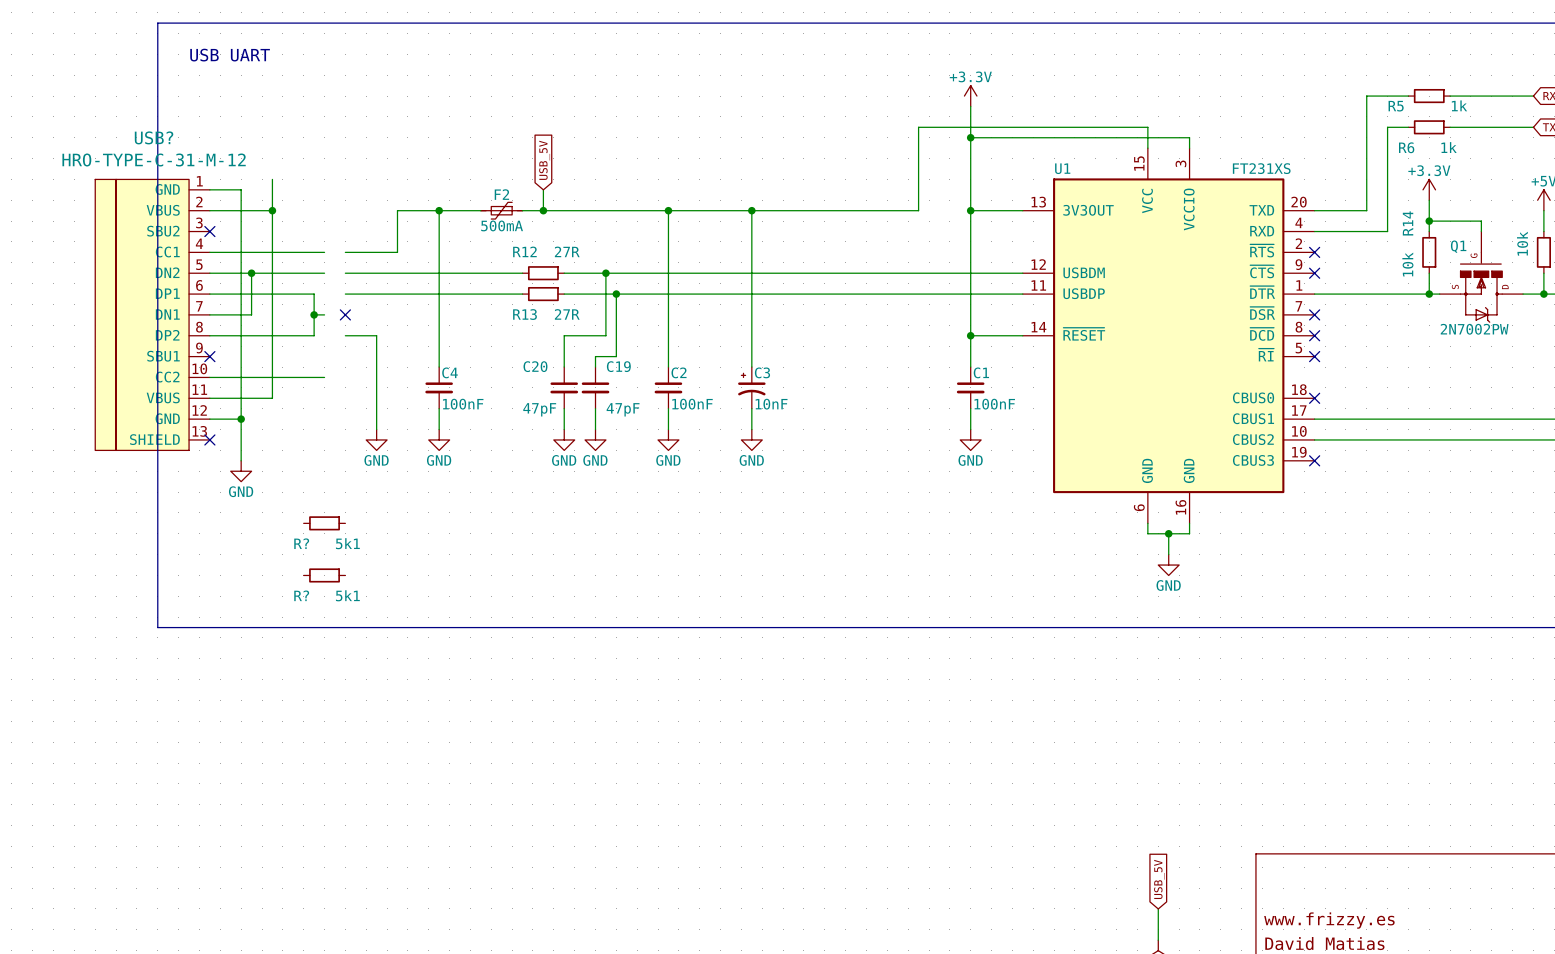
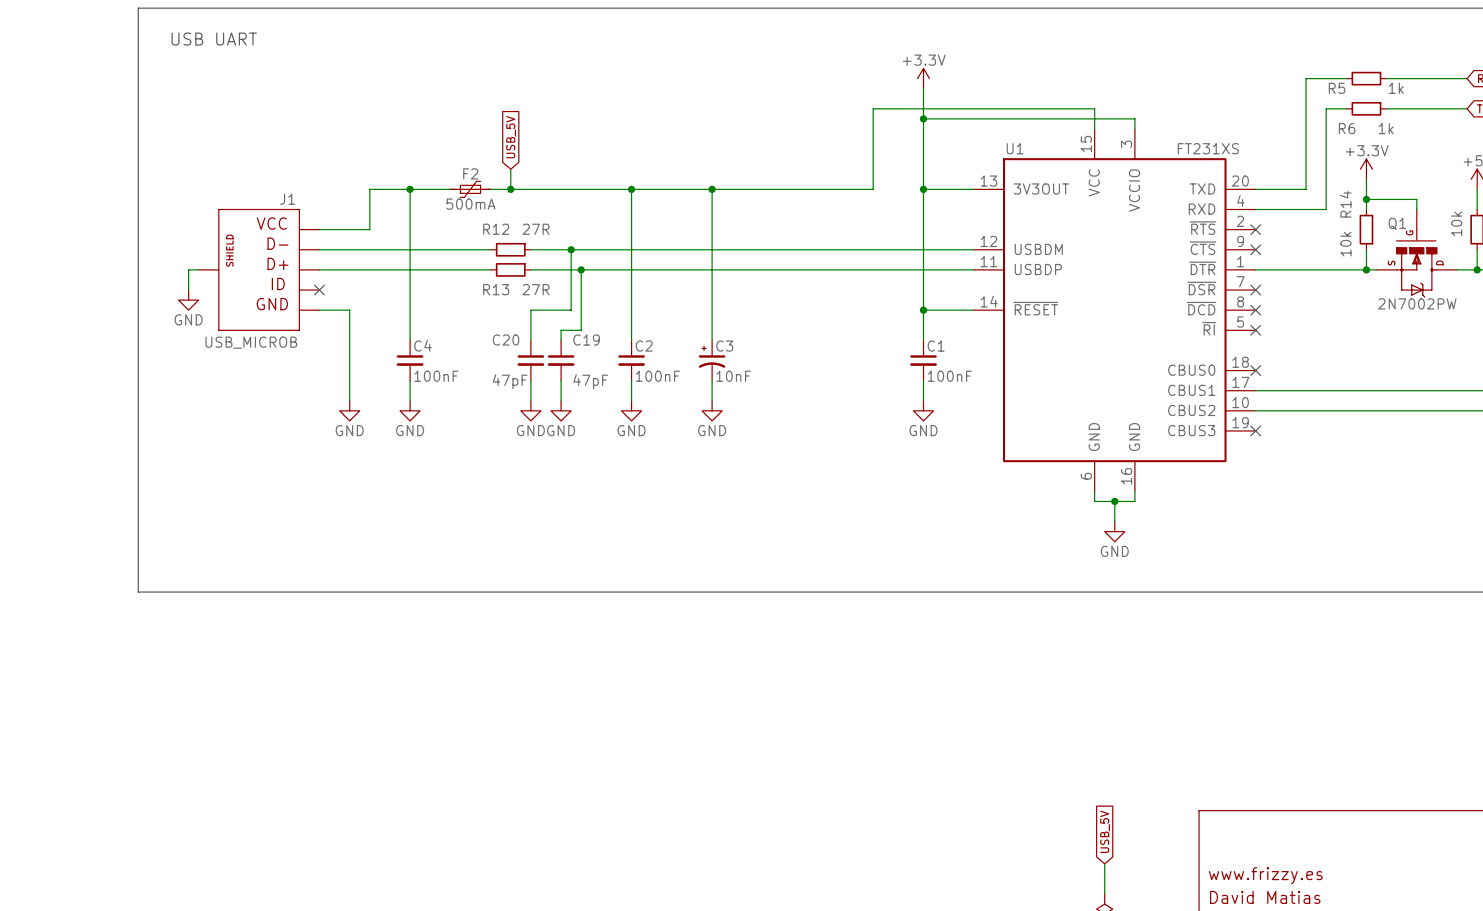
wire: (272, 179) (272, 398) (209, 398) -> none
wire: (209, 189) (241, 189) (241, 460) -> none
wire: (209, 210) (272, 210) -> none
junction: (272, 210) -> none
no-connect mark: (209, 231) -> none
wire: (209, 252) (324, 252) -> none
wire: (209, 273) (324, 273) -> none
wire: (251, 273) (251, 314) (209, 314) -> (188, 269) (188, 290)
junction: (251, 273) -> none
wire: (220, 294) (314, 294) (314, 335) (209, 335) -> none
J1: none -> USB_MICROB (259, 269)
USB?: HRO-TYPE-C-31-M-12 (152, 314) -> none
wire: (314, 314) (324, 314) -> none
junction: (314, 314) -> none
no-connect mark: (209, 356) -> none
wire: (209, 377) (324, 377) -> none
wire: (209, 419) (241, 419) -> none
junction: (241, 419) -> none
no-connect mark: (209, 439) -> none
power symbol position: GND (241, 471) -> GND (188, 300)
R?: 5k1 (324, 523) -> none
R?: 5k1 (324, 575) -> none

